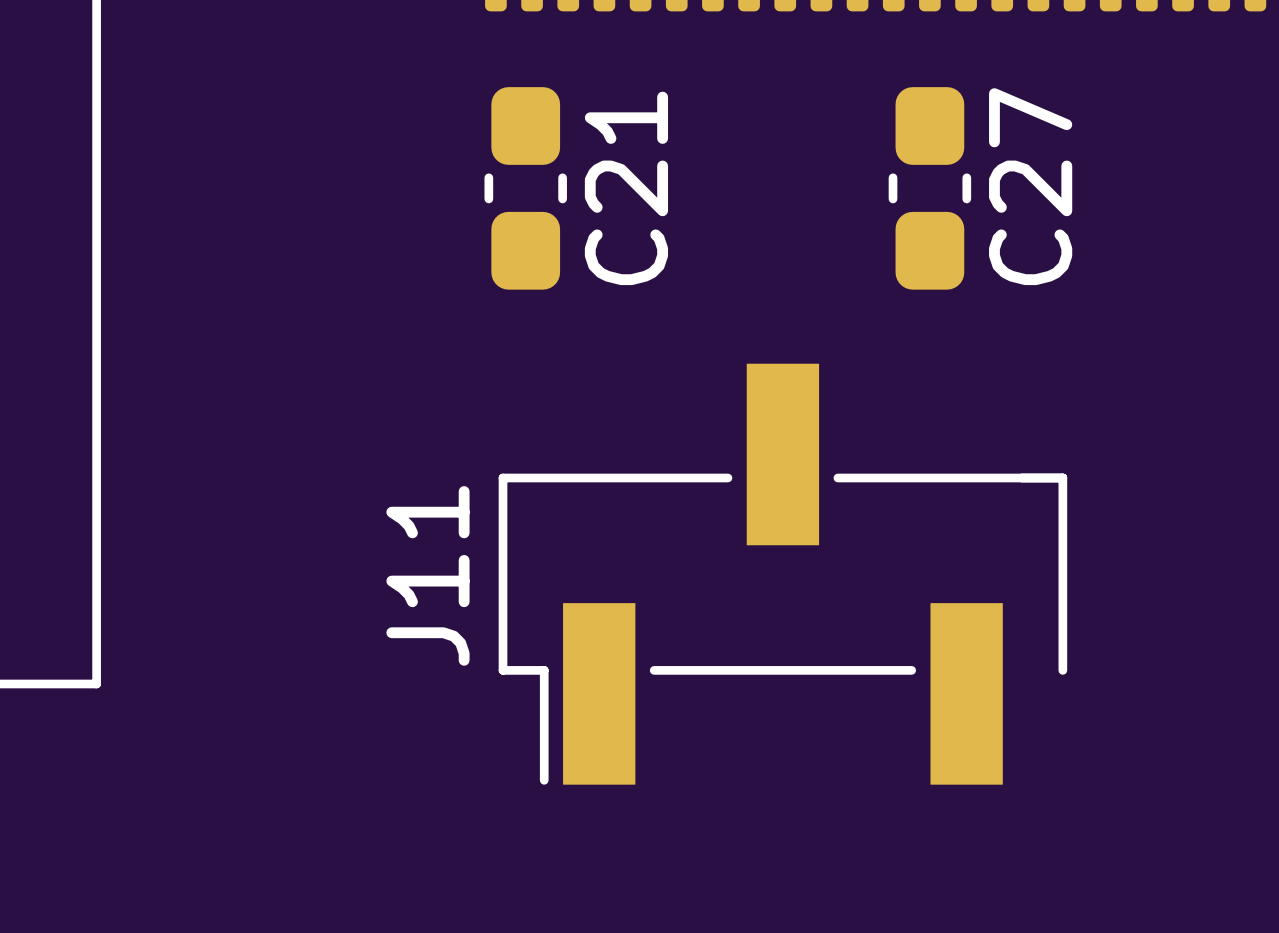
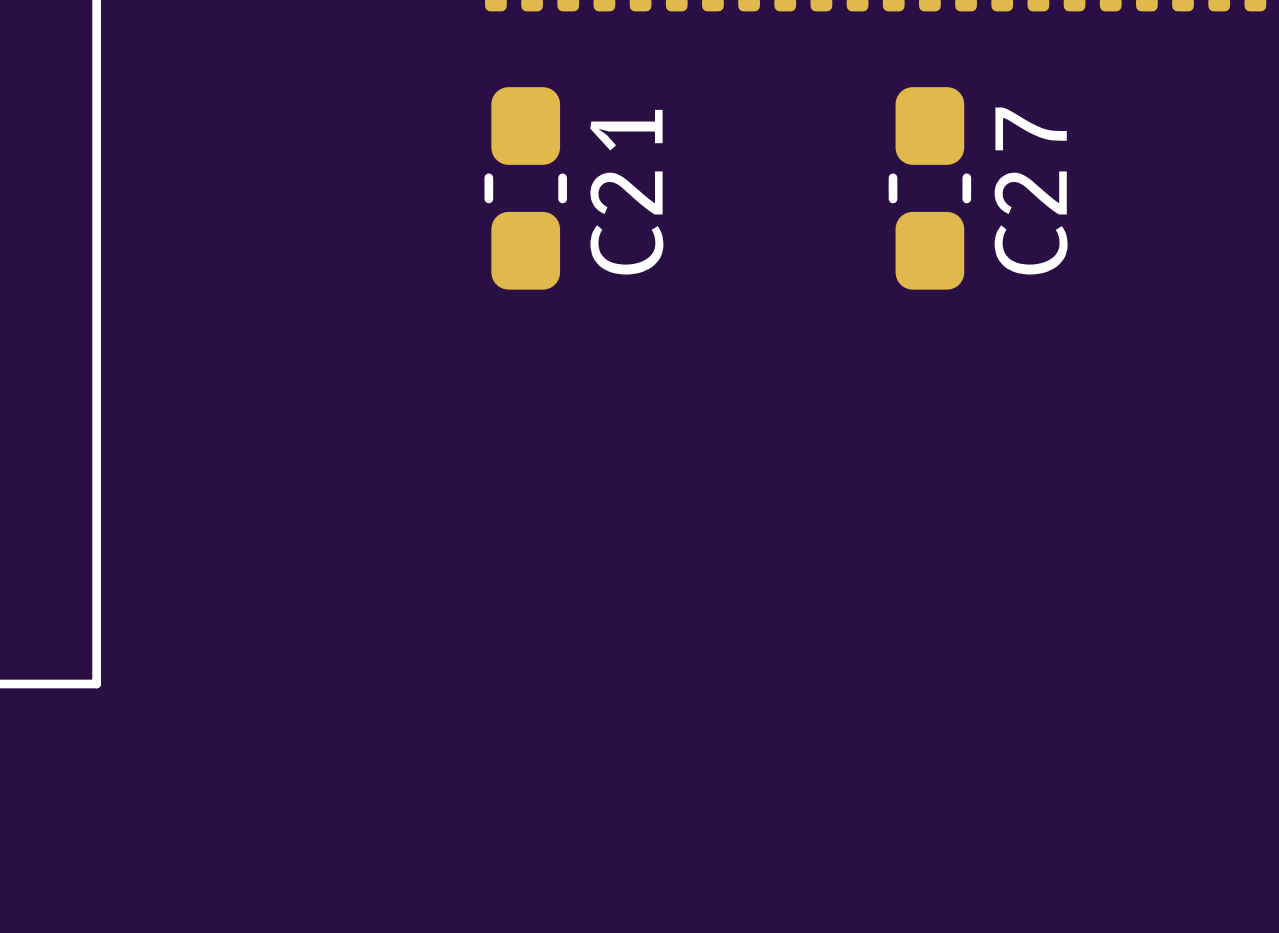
J11: (782, 574) -> none

